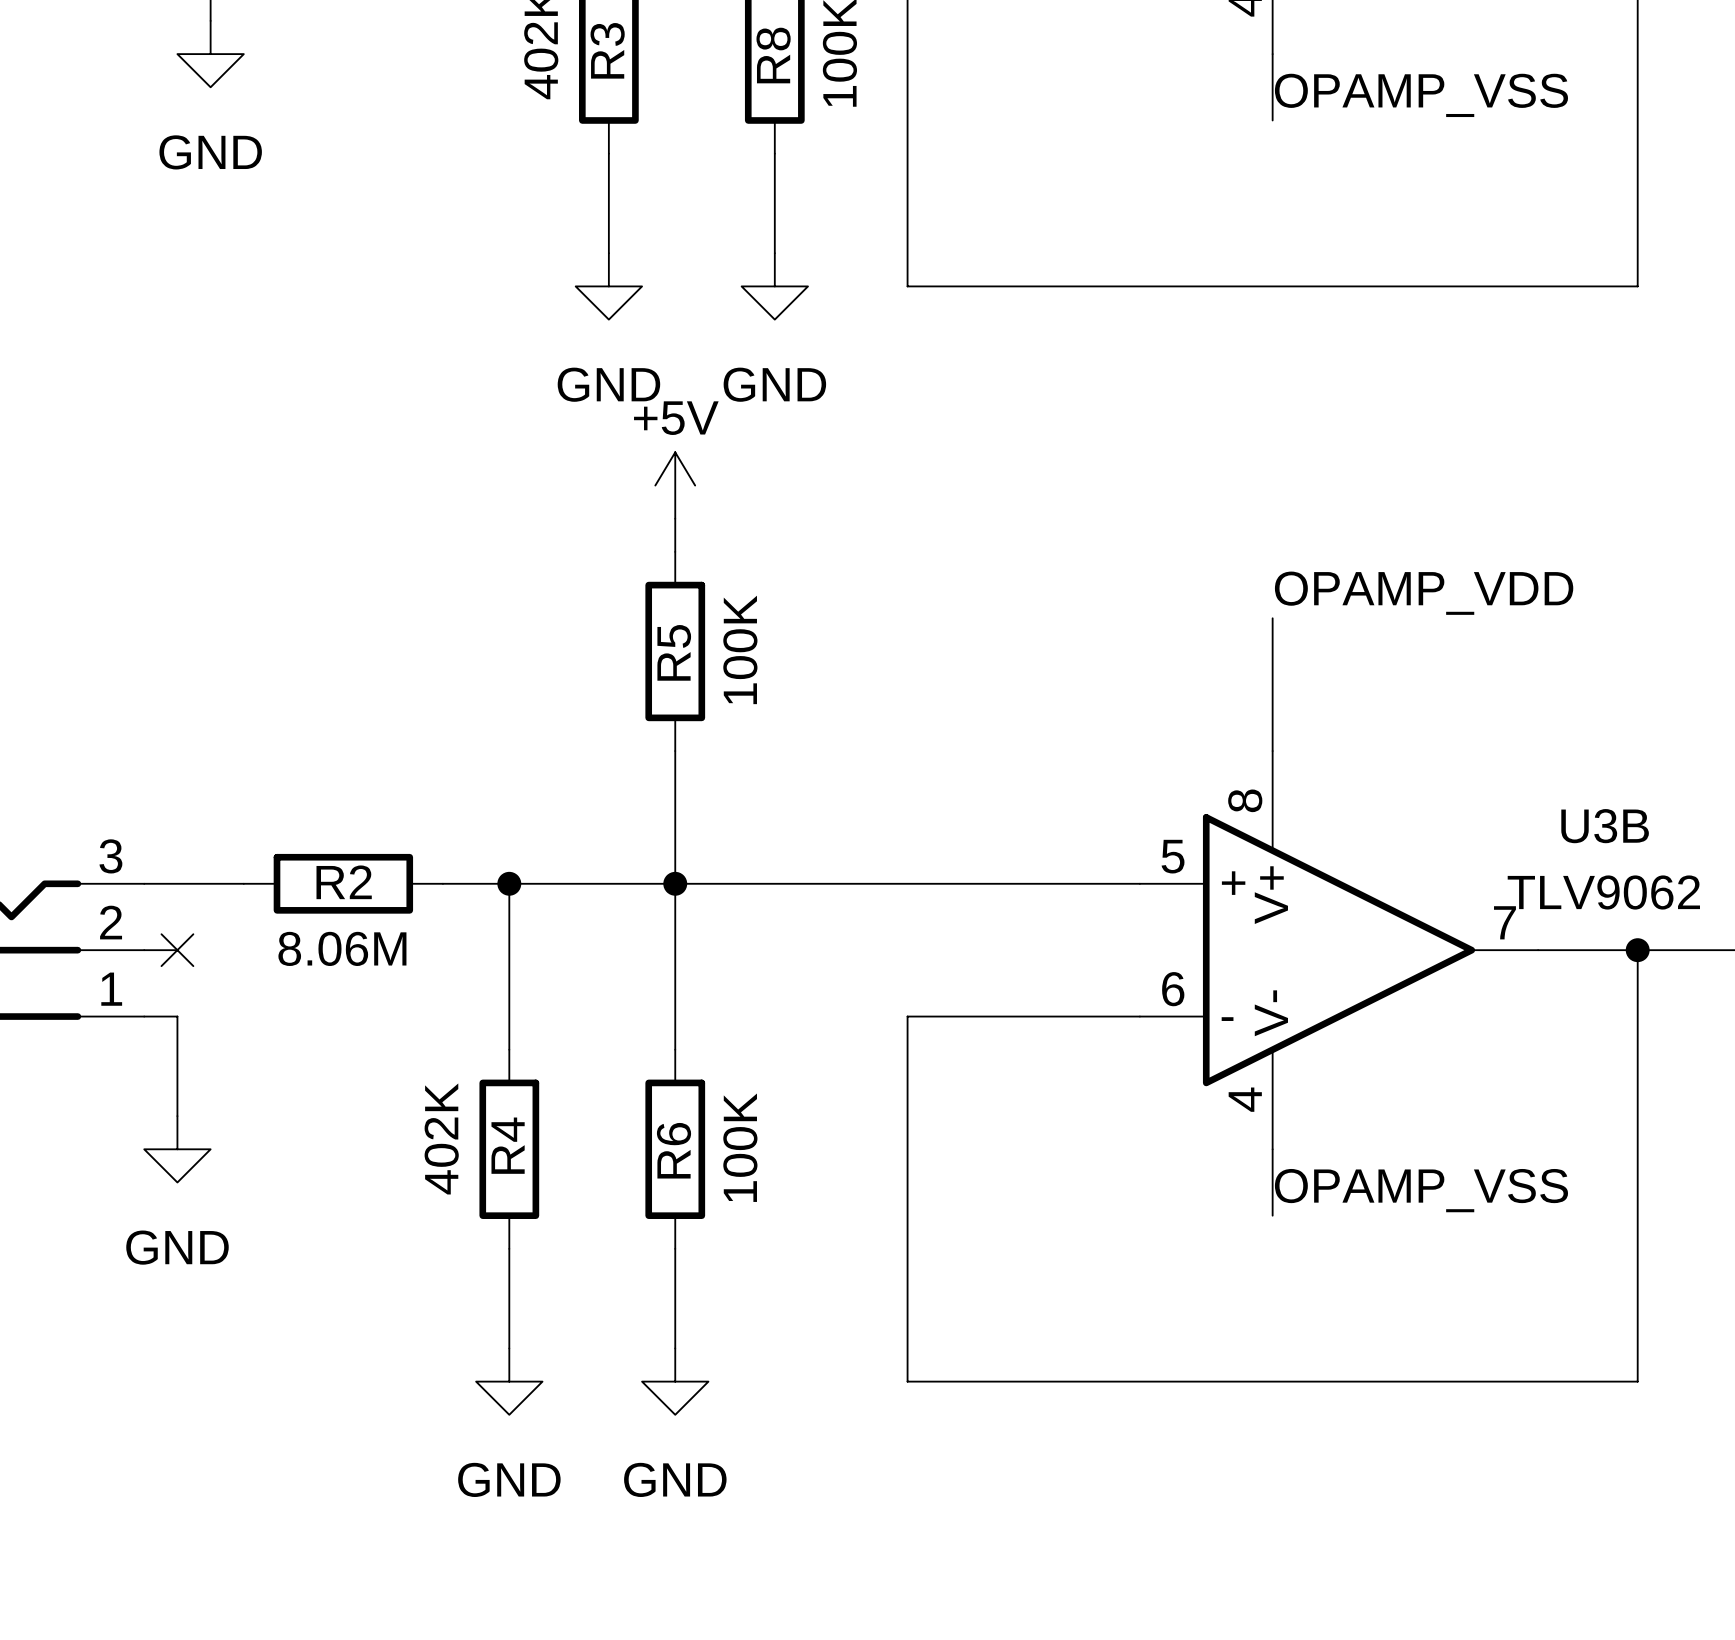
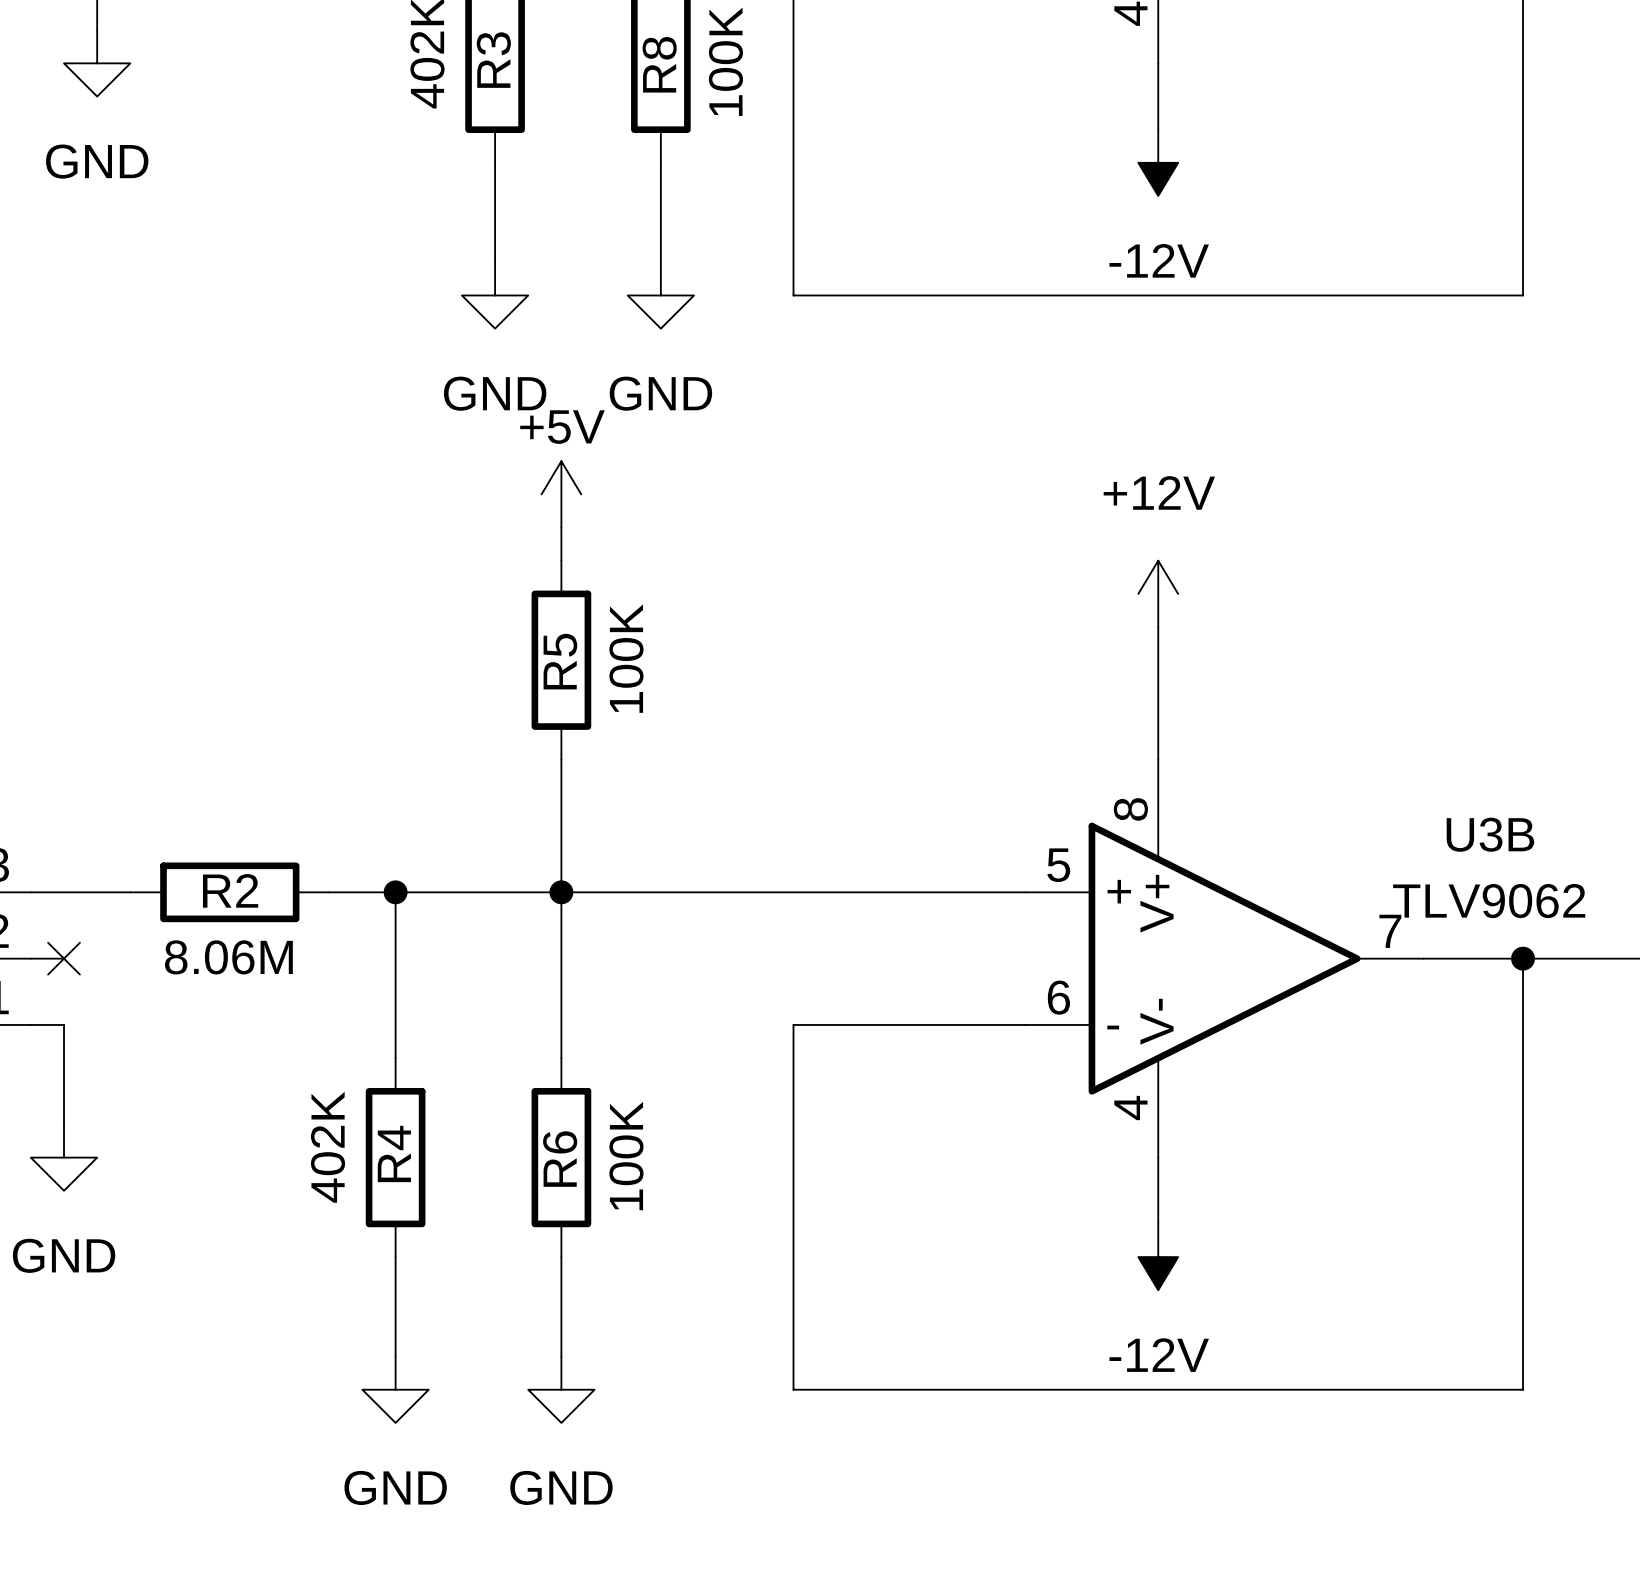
label: OPAMP_VSS (1421, 95) -> none
power symbol: none -> -12V (1158, 162)
power symbol: none -> +12V (1158, 593)
label: OPAMP_VDD (1424, 593) -> none
label: OPAMP_VSS (1421, 1190) -> none
power symbol: none -> -12V (1158, 1257)

